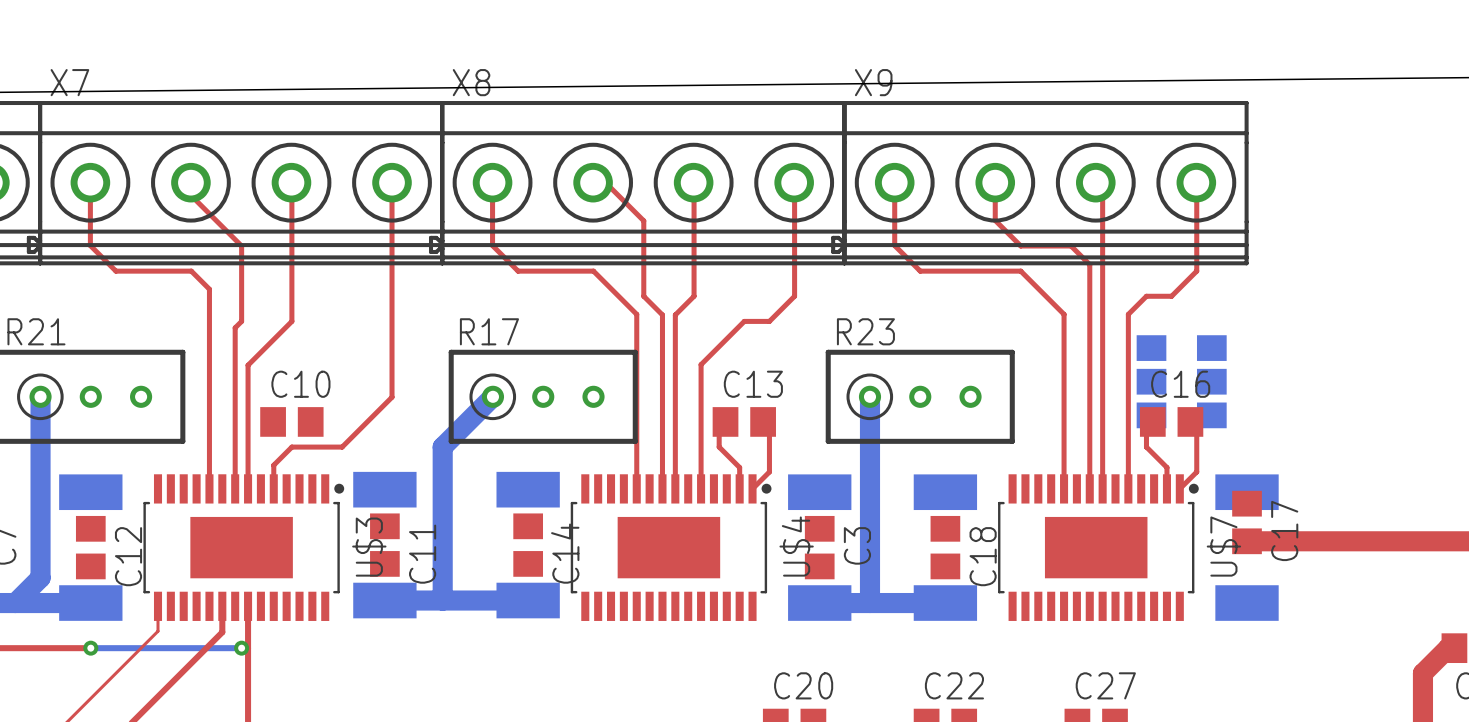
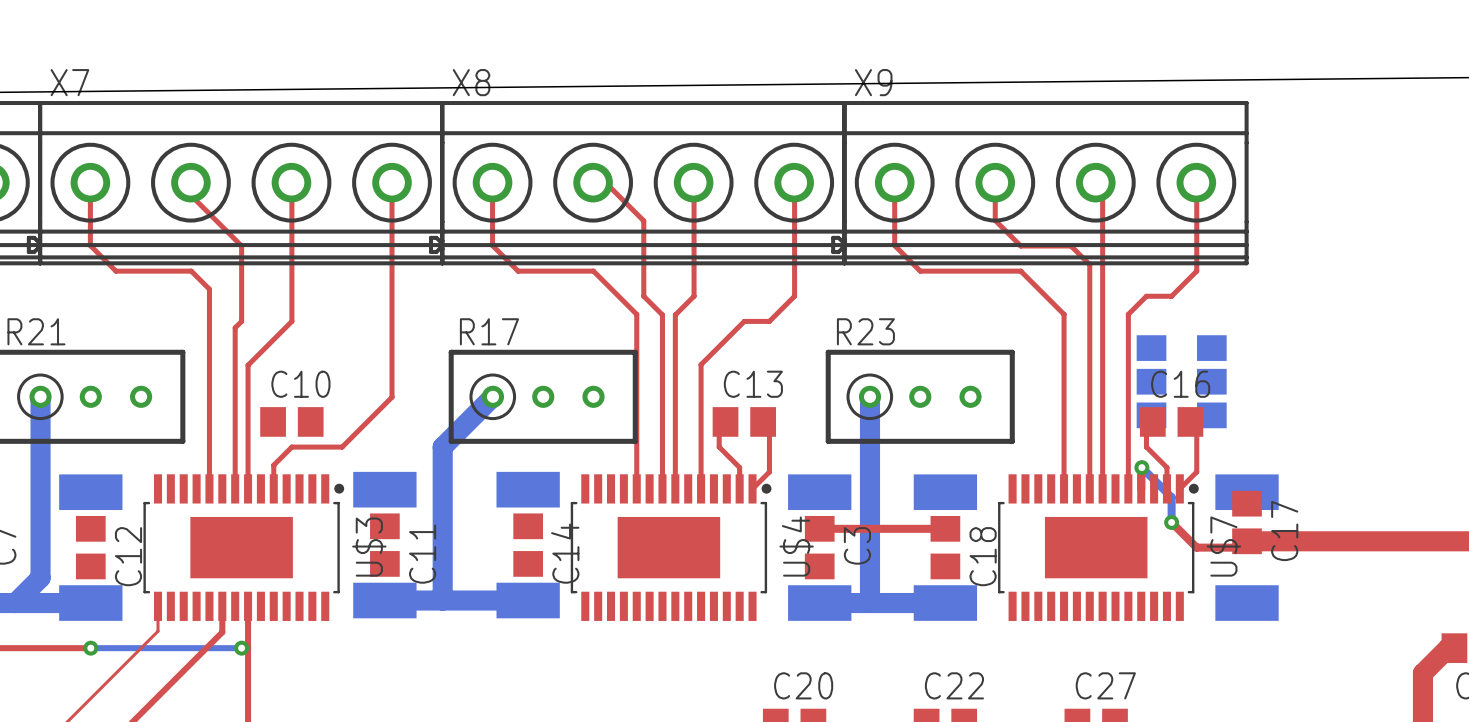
bottom track: none -> (1141, 467) (1171, 497) (1171, 522)
via: none -> (1141, 467)
top track: none -> (1171, 522) (1196, 547) (1240, 547) (1247, 541)
via: none -> (1171, 522)
top track: none -> (819, 528) (945, 528)

